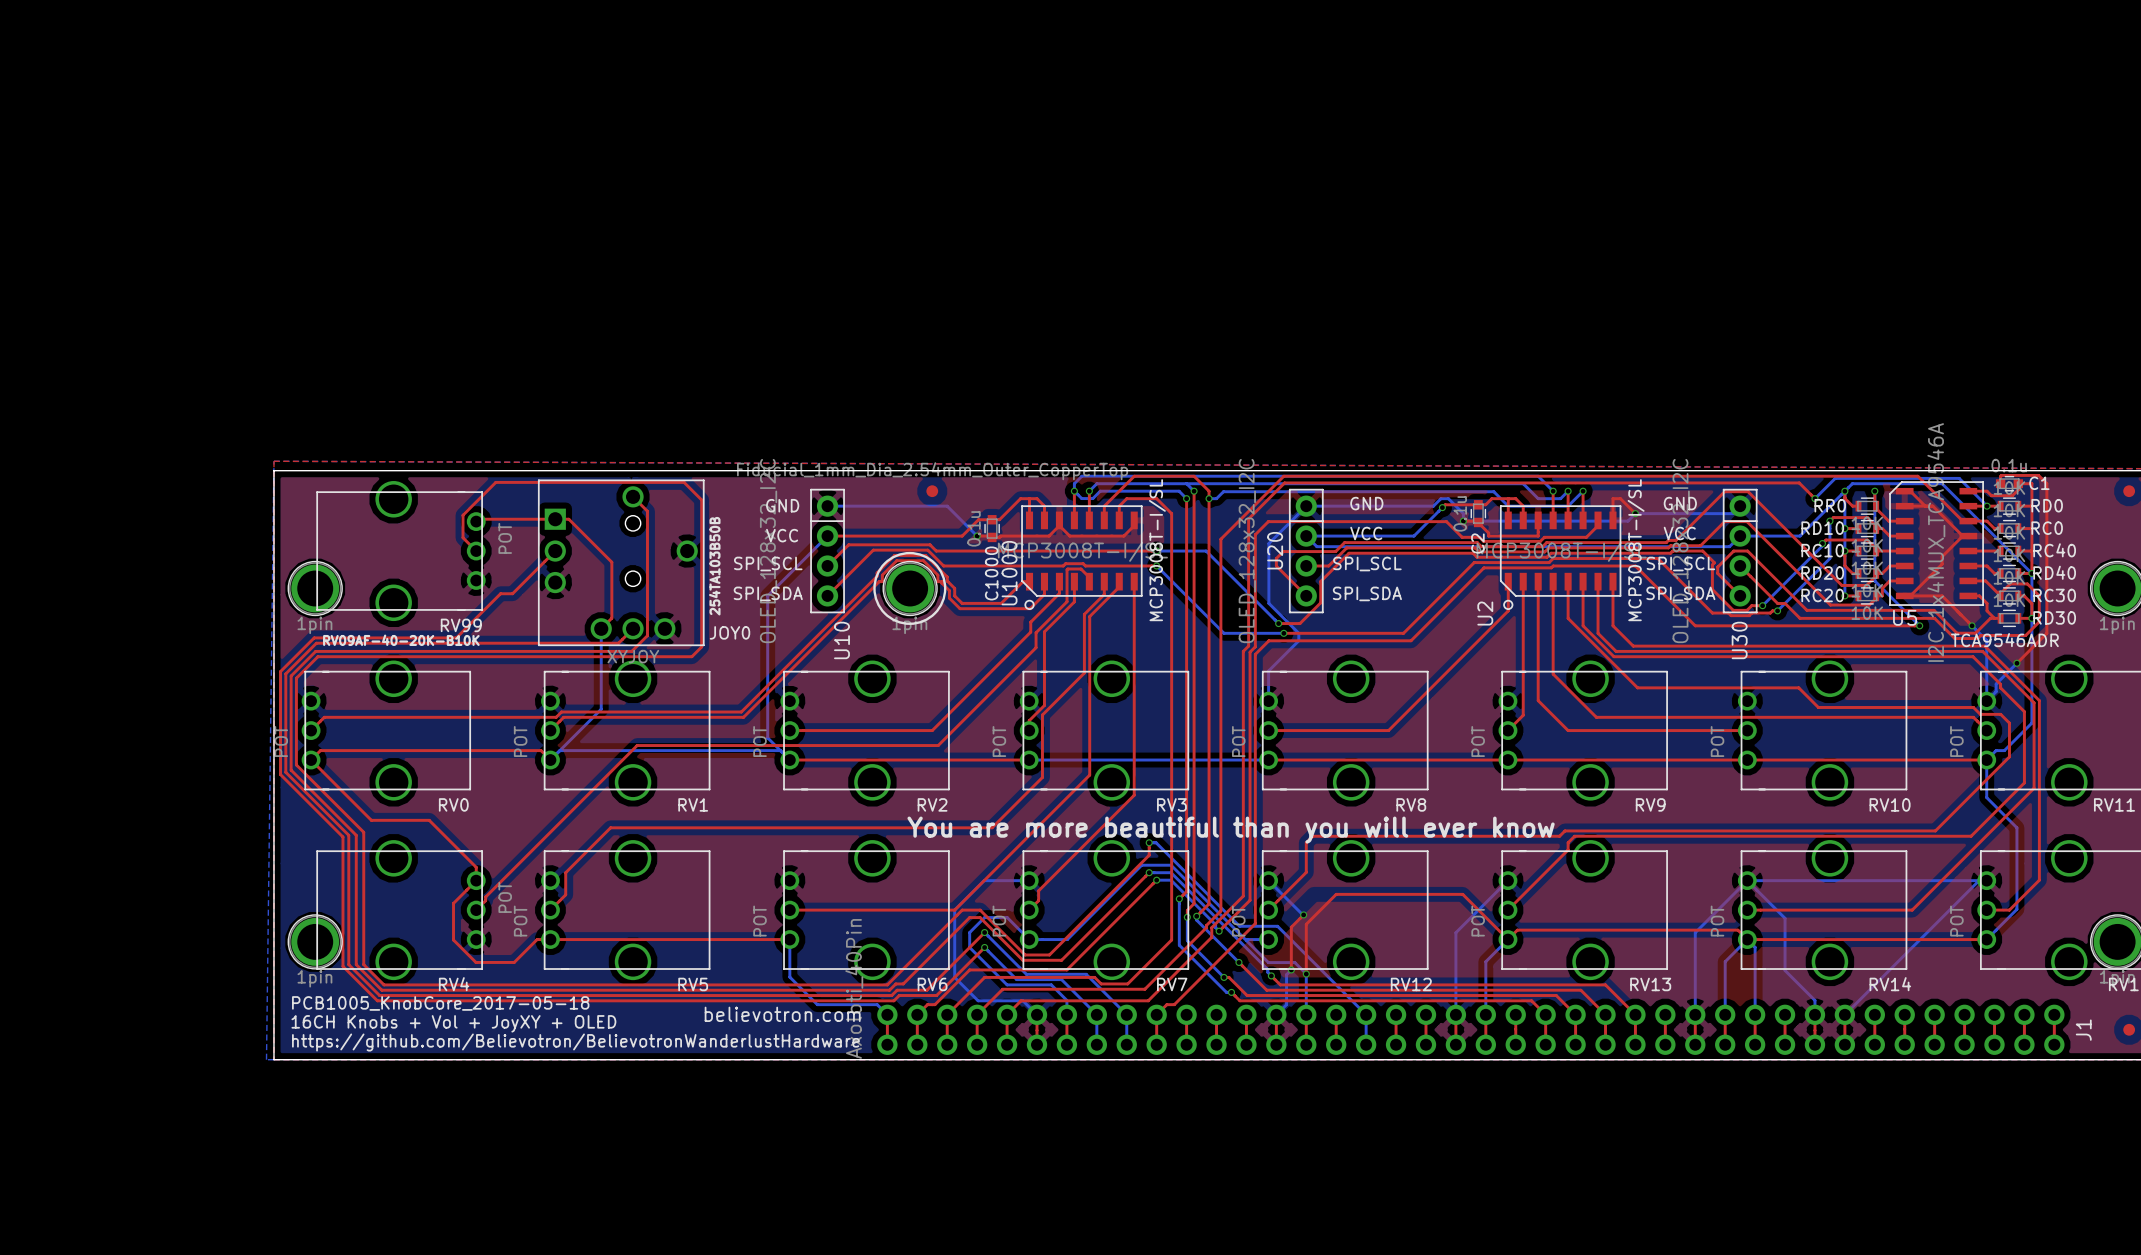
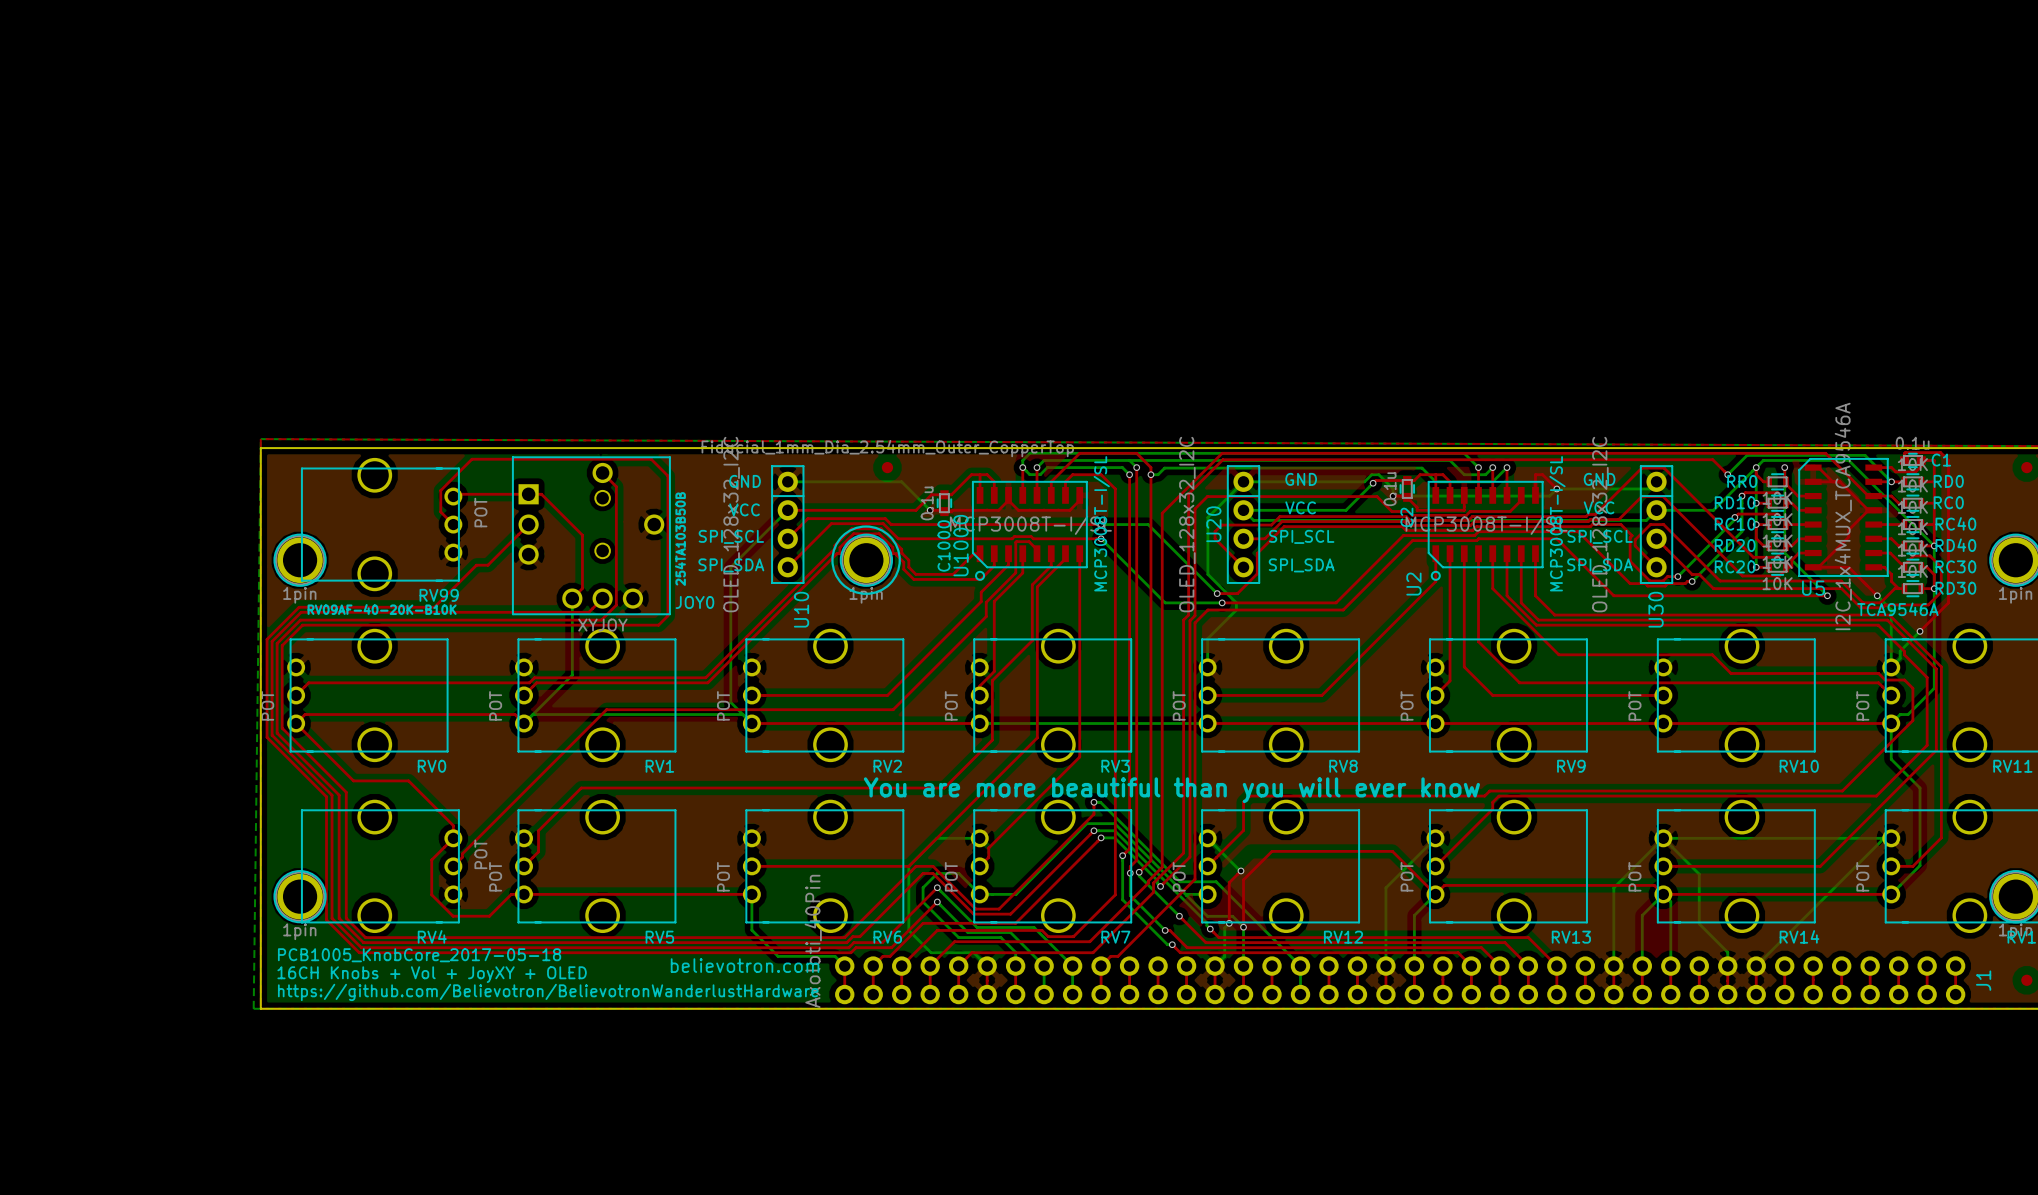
text: TCA9546ADR (2004, 640) -> TCA9546A (1897, 609)

